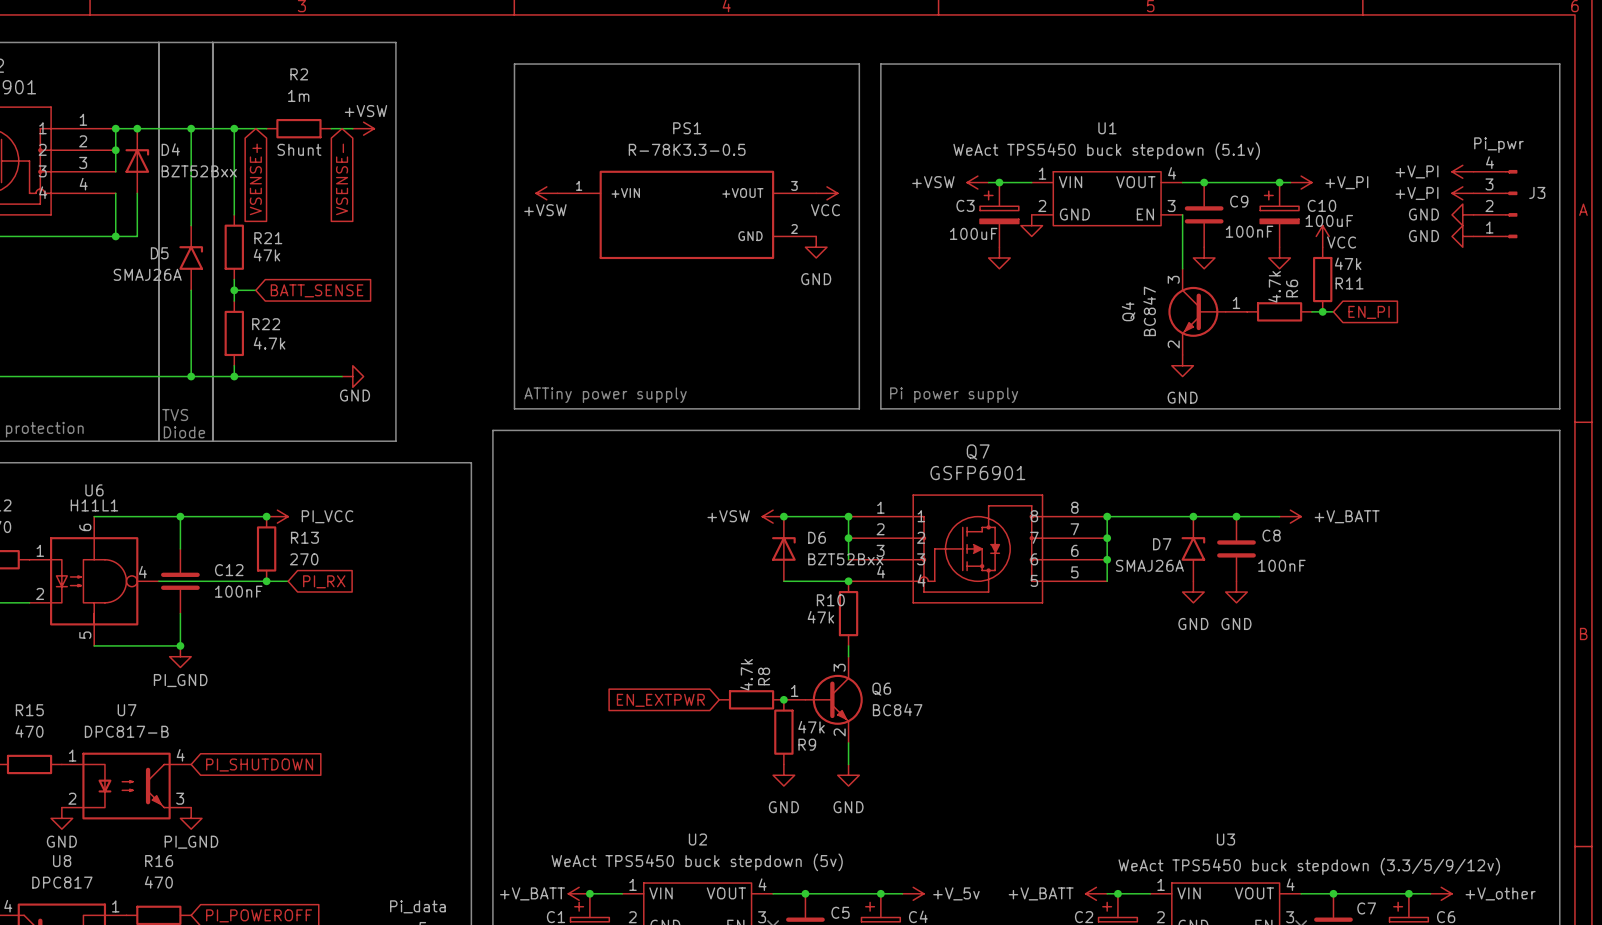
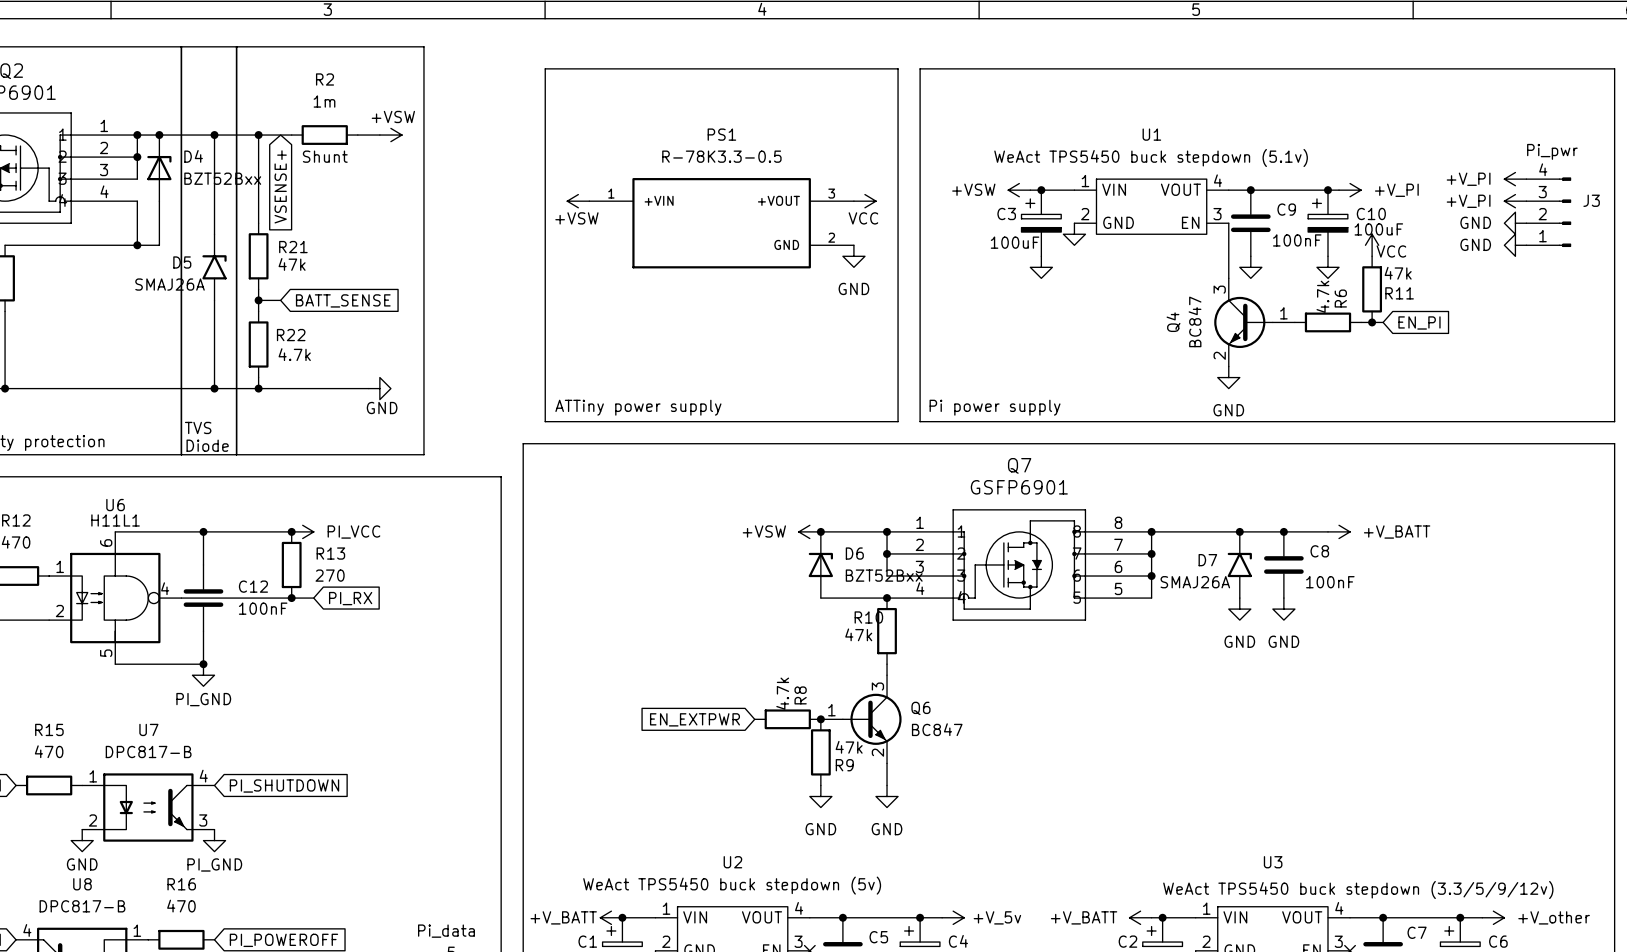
global label: VSENSE- (342, 179) -> none
U8 value: DPC817 (62, 882) -> DPC817-B (82, 906)

